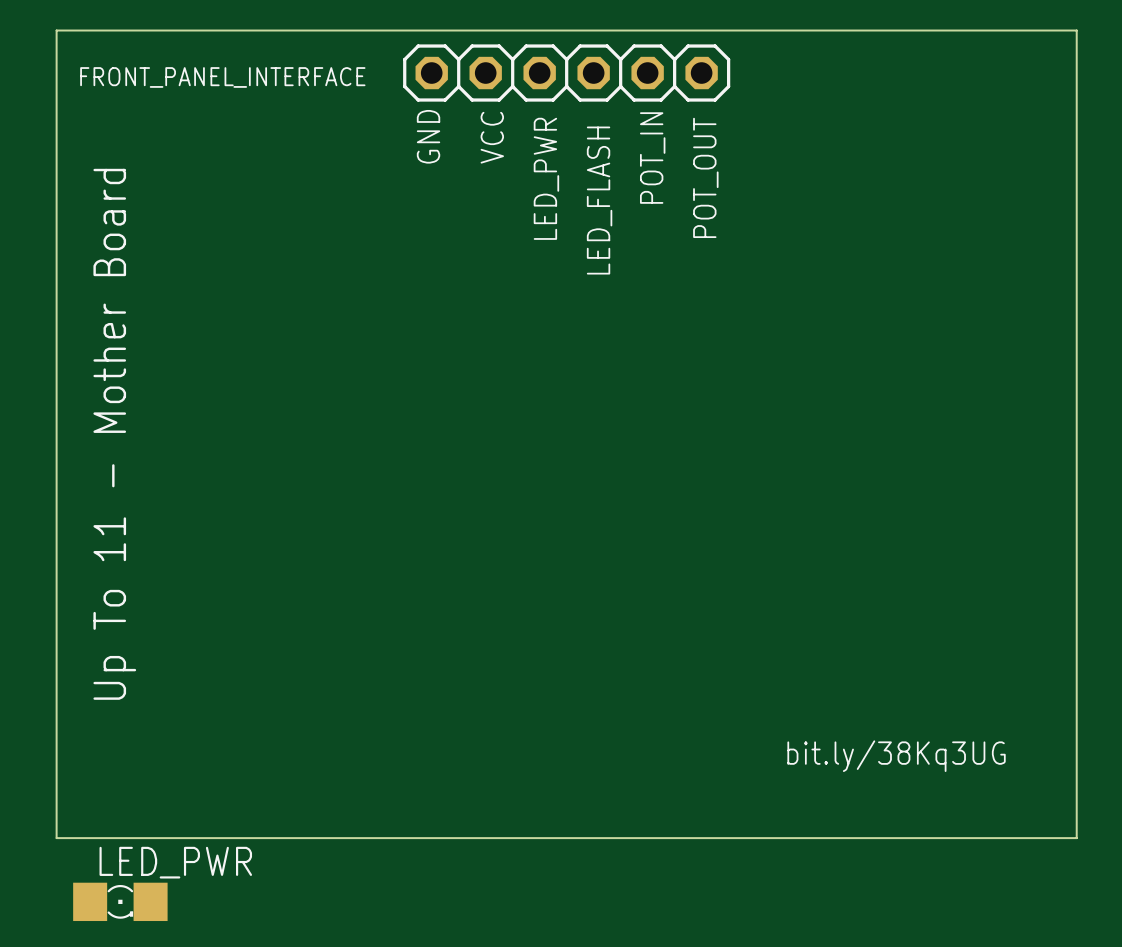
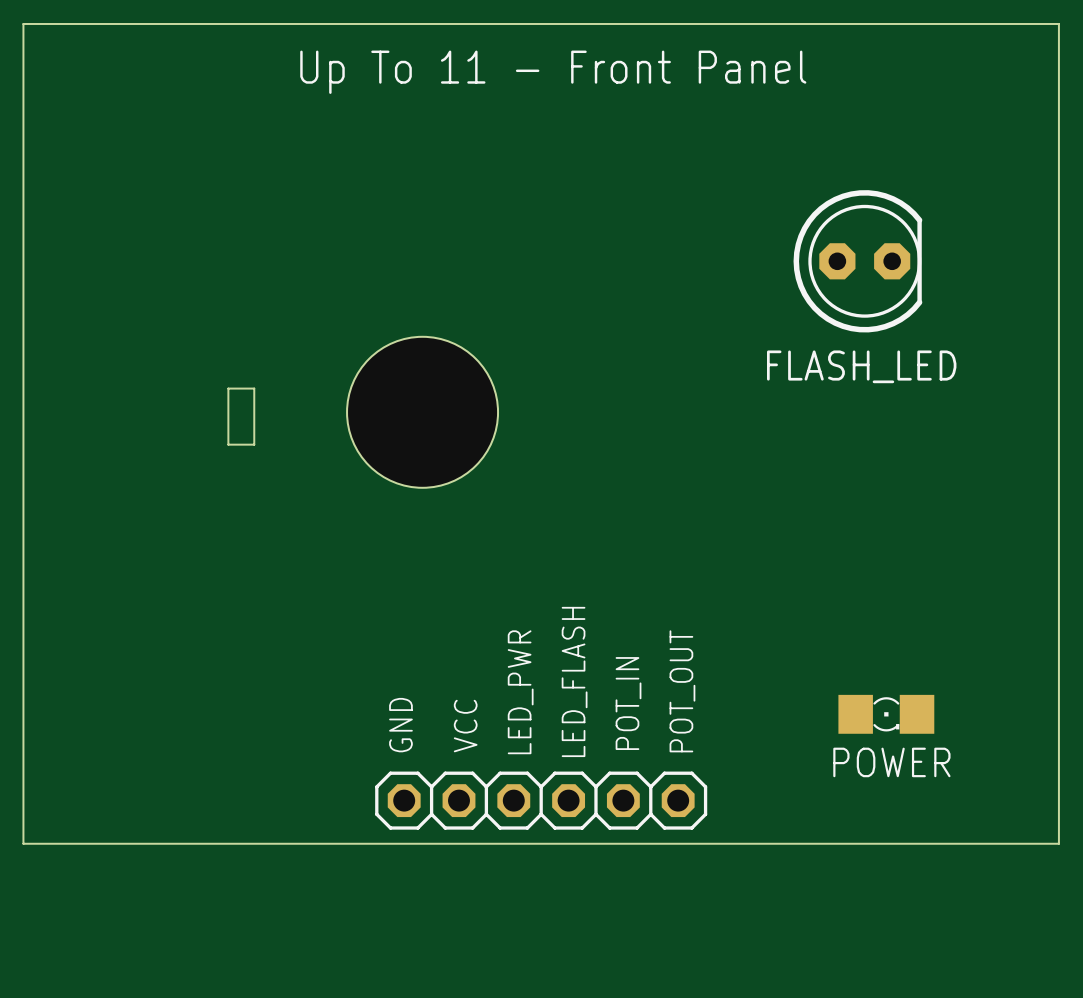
FRONT_PANEL_INTERFACE: (566, 73) -> none
text: none -> Up To 11 - Front Panel (553, 72)
text: GND (428, 136) -> none
text: VCC (492, 137) -> none
text: POT_IN (652, 158) -> none
text position: POT_OUT (705, 177) -> POT_OUT (682, 691)
text position: LED_PWR (546, 178) -> LED_PWR (520, 692)
text position: LED_FLASH (599, 200) -> LED_FLASH (574, 681)
FLASH_LED: none -> (857, 261)
board edge: none -> (228, 388) (254, 388) (254, 444) (228, 444) (228, 388)
hole: none -> (422, 412)
text: Up To 11 - Mother Board (114, 434) -> none
text: none -> POT_IN (628, 703)
POWER: none -> (886, 714)
text: none -> GND (400, 725)
text: none -> VCC (465, 726)
text: bit.ly/38Kq3UG (896, 756) -> none
part: none -> (541, 800)
LED_PWR: (120, 901) -> none

